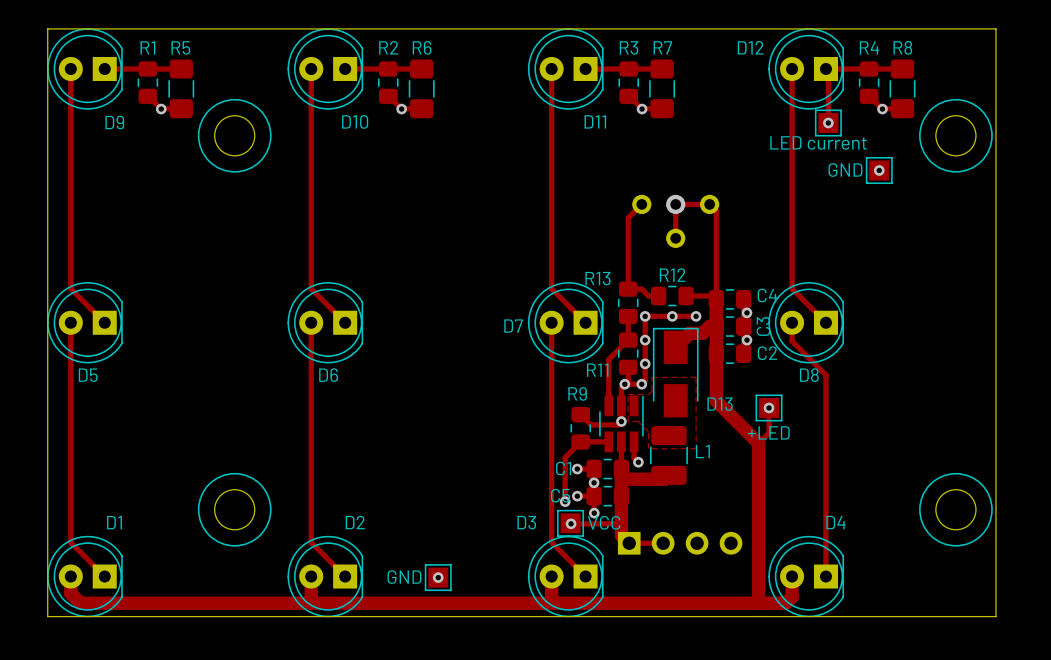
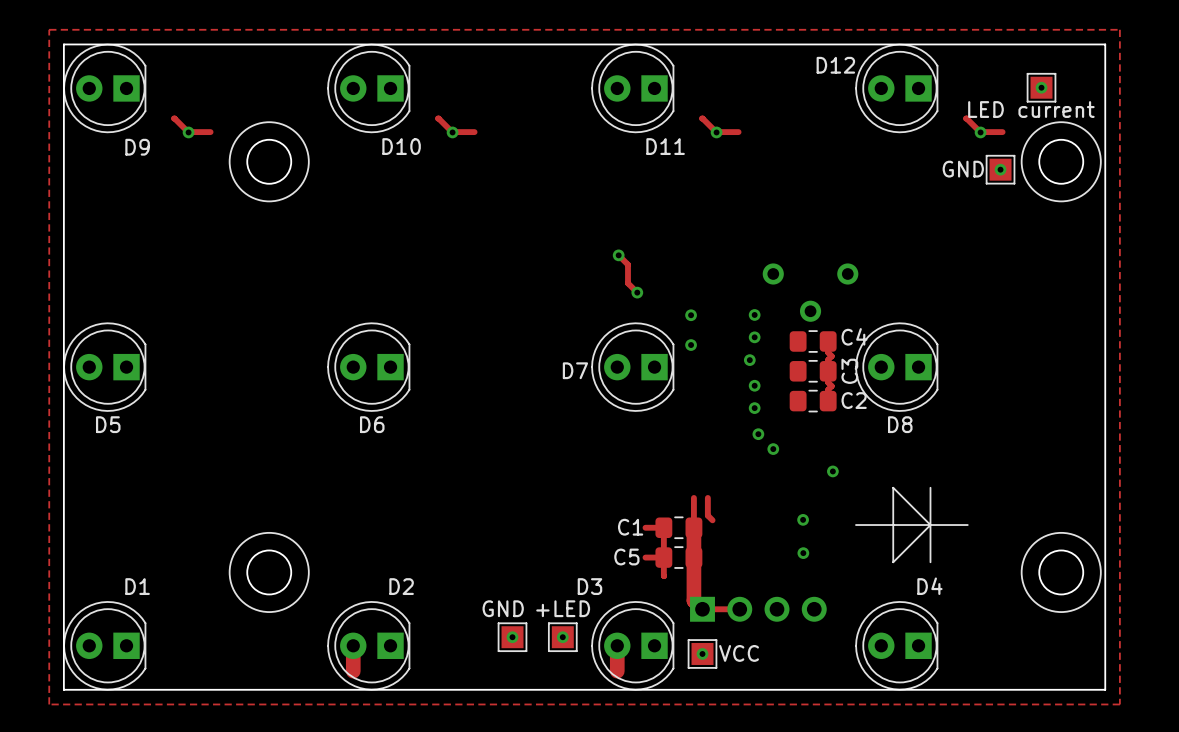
zone outline: none -> (49, 29) (49, 704) (1119, 704) (1119, 29) (49, 29)
track: (70, 68) (70, 288) (104, 322) -> none
track: (104, 68) (181, 68) -> none
track: (311, 68) (311, 288) (345, 322) -> none
track: (345, 68) (421, 68) -> none
track: (551, 68) (551, 288) (585, 322) -> none
track: (585, 68) (662, 68) -> none
track: (792, 68) (792, 288) (825, 322) -> none
track: (902, 68) (825, 68) (828, 71) (828, 123) -> none
via: none -> (1041, 87)
R1: (147, 82) -> none
R2: (388, 82) -> none
R3: (628, 82) -> none
R4: (869, 82) -> none
R5: (181, 88) -> none
R6: (421, 88) -> none
R7: (662, 88) -> none
R8: (902, 88) -> none
LED current position: (828, 123) -> (1041, 87)
via: (828, 123) -> none
GND position: (879, 170) -> (1000, 169)
via position: (879, 170) -> (1000, 169)
track: (641, 204) (628, 217) (628, 289) -> none
via: (675, 204) -> none
track: none -> (618, 255) (627, 264) (627, 283) (637, 292)
via: none -> (618, 255)
part position: (675, 221) -> (810, 292)
track: (675, 238) (675, 204) (709, 204) (716, 211) (716, 299) -> none
via: none -> (637, 292)
via: none -> (691, 315)
via: none -> (754, 314)
track: (628, 289) (641, 289) (648, 296) (658, 296) -> none
via: none -> (754, 337)
R12: (672, 296) -> none
track: (686, 296) (712, 296) (716, 299) -> none
track: (716, 299) (716, 401) (758, 443) -> none
via: none -> (691, 345)
R13: (628, 302) -> none
via: (746, 312) -> none
track: (628, 316) (628, 340) (608, 359) (608, 405) -> none
via: (645, 316) -> none
track: (696, 316) (645, 316) (645, 380) (641, 384) (624, 384) -> none
via: (696, 316) -> none
track: (70, 322) (70, 542) (104, 576) -> none
track: (311, 322) (311, 542) (345, 576) -> none
track: (551, 322) (551, 542) (585, 576) -> none
track: (792, 322) (792, 341) (825, 375) (825, 576) -> none
track: (716, 326) (709, 326) (702, 333) (689, 333) (675, 347) -> none
via: none -> (754, 385)
via: (645, 340) -> none
via: (746, 340) -> none
R11: (628, 353) -> none
via: none -> (754, 408)
via: (645, 363) -> none
track: (628, 367) (628, 380) (621, 387) (621, 421) (618, 424) (591, 424) (580, 414) -> none
D13: (675, 372) -> none
zone outline: (651, 377) (651, 391) (648, 394) (628, 394) (628, 421) (638, 421) (648, 431) (648, 448) (696, 448) (696, 377) (651, 377) -> none
via: none -> (758, 434)
via: (624, 384) -> none
via: (641, 384) -> none
via: none -> (773, 449)
track: (769, 407) (769, 433) (758, 443) -> none
+LED position: (769, 407) -> (562, 637)
via position: (769, 407) -> (832, 471)
via: (621, 421) -> none
part: (621, 423) -> none
R9: (580, 428) -> none
+LED name position: +LED (768, 432) -> +LED (563, 608)
line: none -> (893, 487) (930, 525) (893, 562) (893, 487)
line: none -> (930, 487) (930, 562)
track: (608, 441) (580, 441) (565, 457) (565, 501) -> none
track: (758, 443) (758, 603) -> none
L1: (668, 455) -> none
via: none -> (803, 519)
via: (638, 462) -> none
line: none -> (855, 525) (967, 525)
via: (577, 469) -> none
track: (668, 475) (665, 479) (621, 479) -> none
via: (594, 482) -> none
via: none -> (803, 553)
via: (577, 496) -> none
via: (565, 501) -> none
via: (594, 513) -> none
track: (621, 518) (616, 523) (570, 523) -> none
VCC position: (570, 523) -> (702, 653)
via: (571, 523) -> none
via: none -> (562, 637)
track: (70, 576) (70, 593) (80, 603) (785, 603) (792, 596) (792, 576) -> none
GND name position: GND (404, 577) -> GND (503, 608)
GND position: (438, 577) -> (512, 637)
via position: (438, 577) -> (512, 637)
via: none -> (702, 653)

